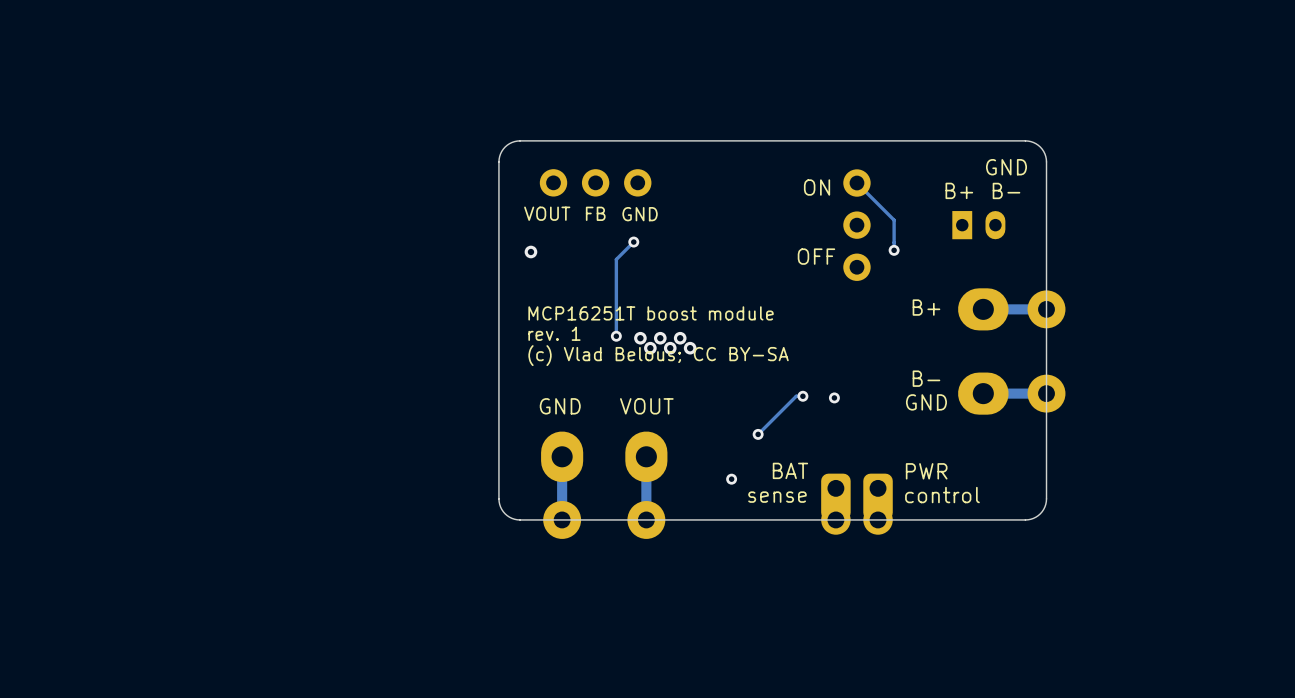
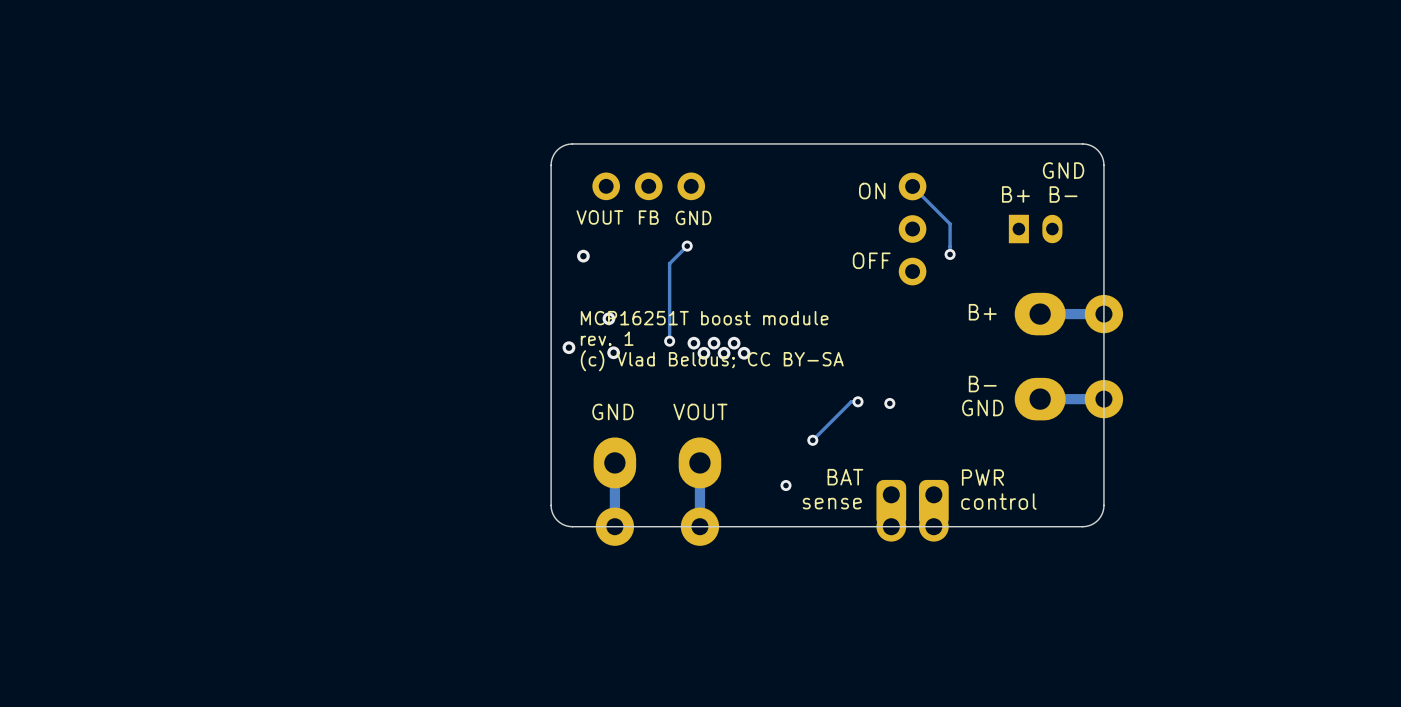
via: none -> (608, 318)
via: none -> (568, 347)
via: none -> (613, 352)

